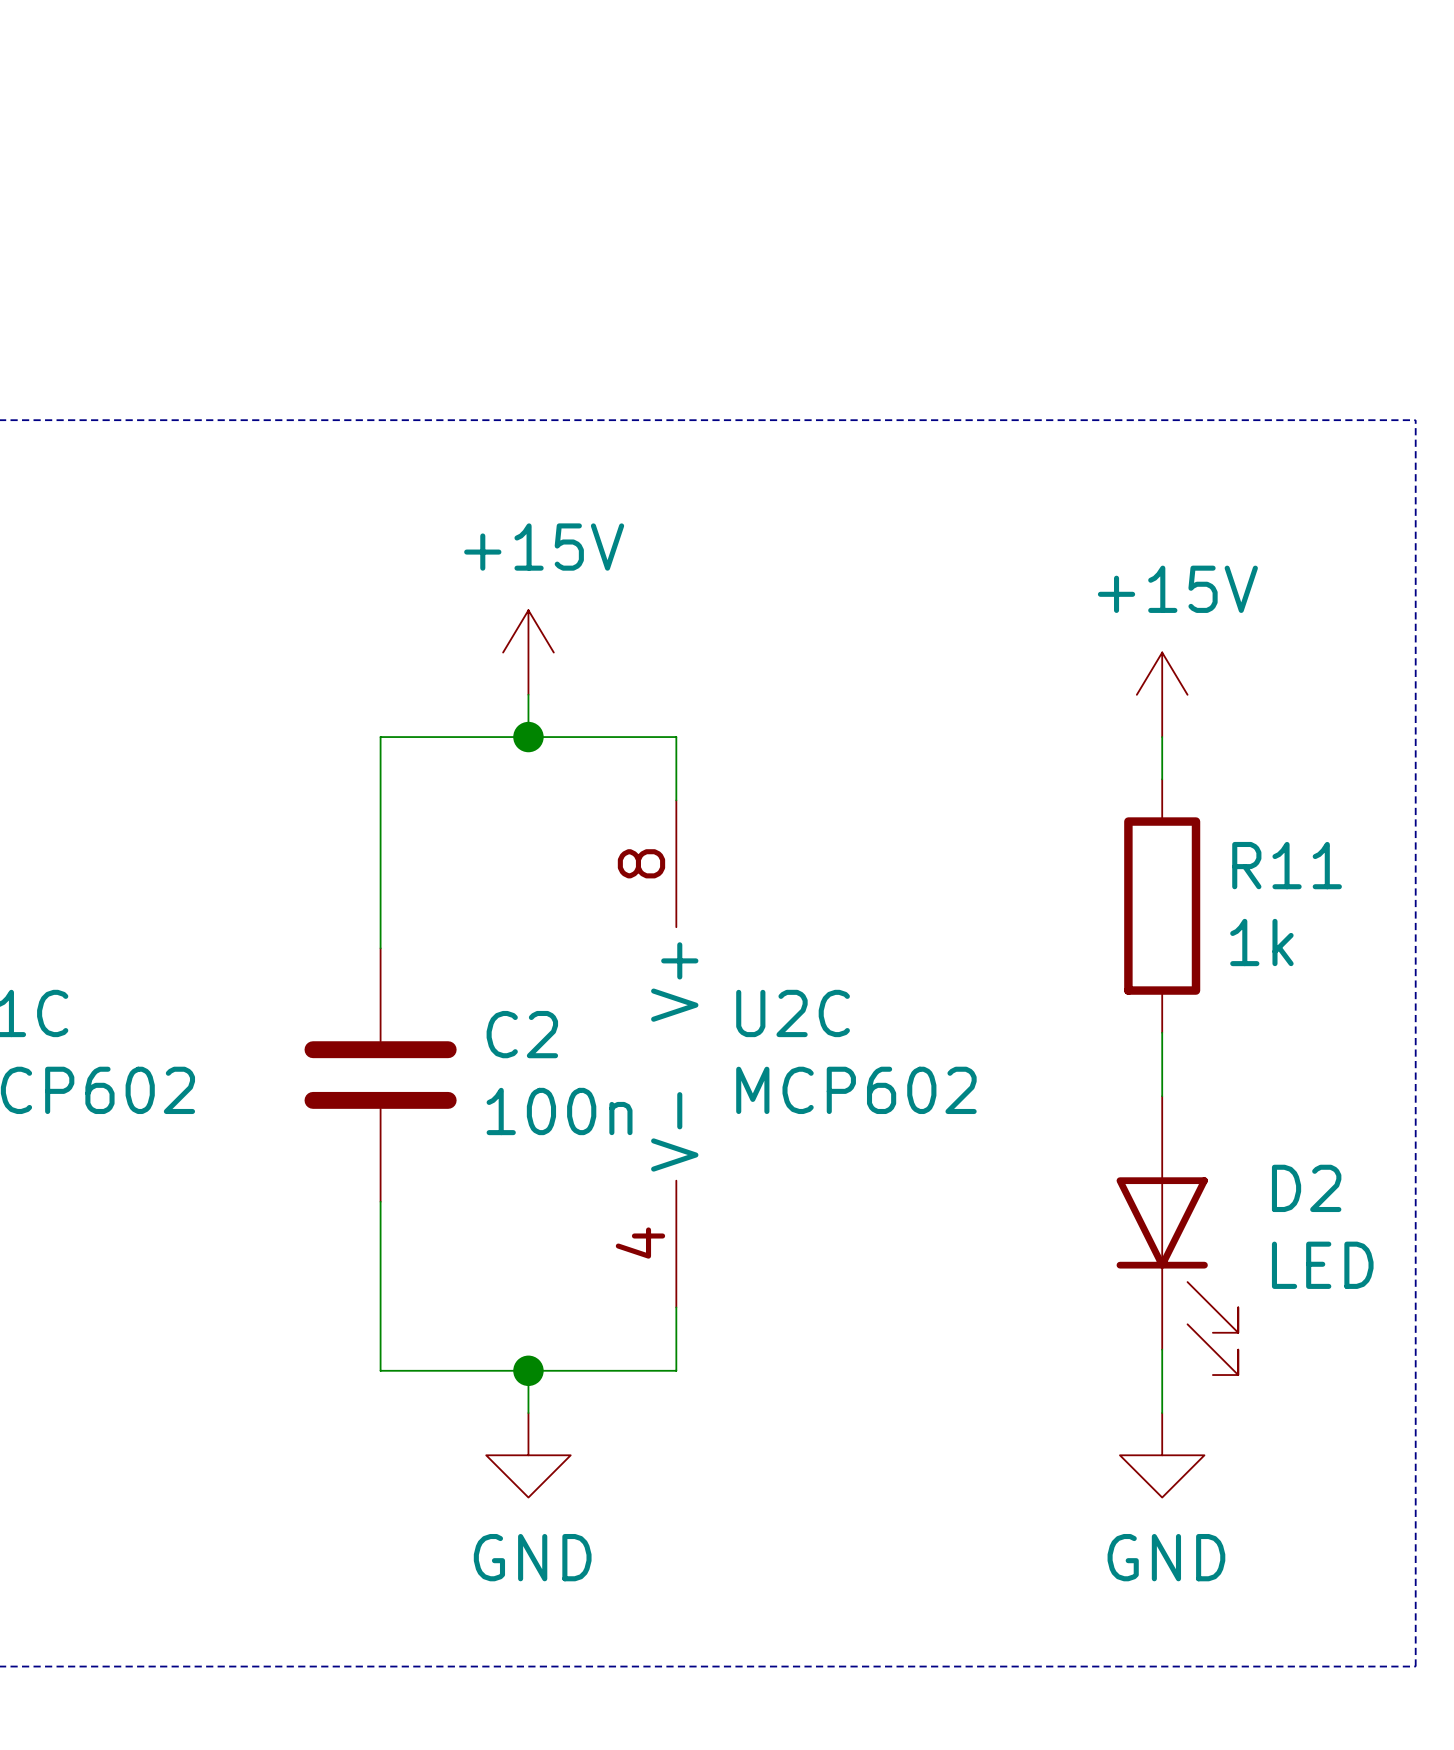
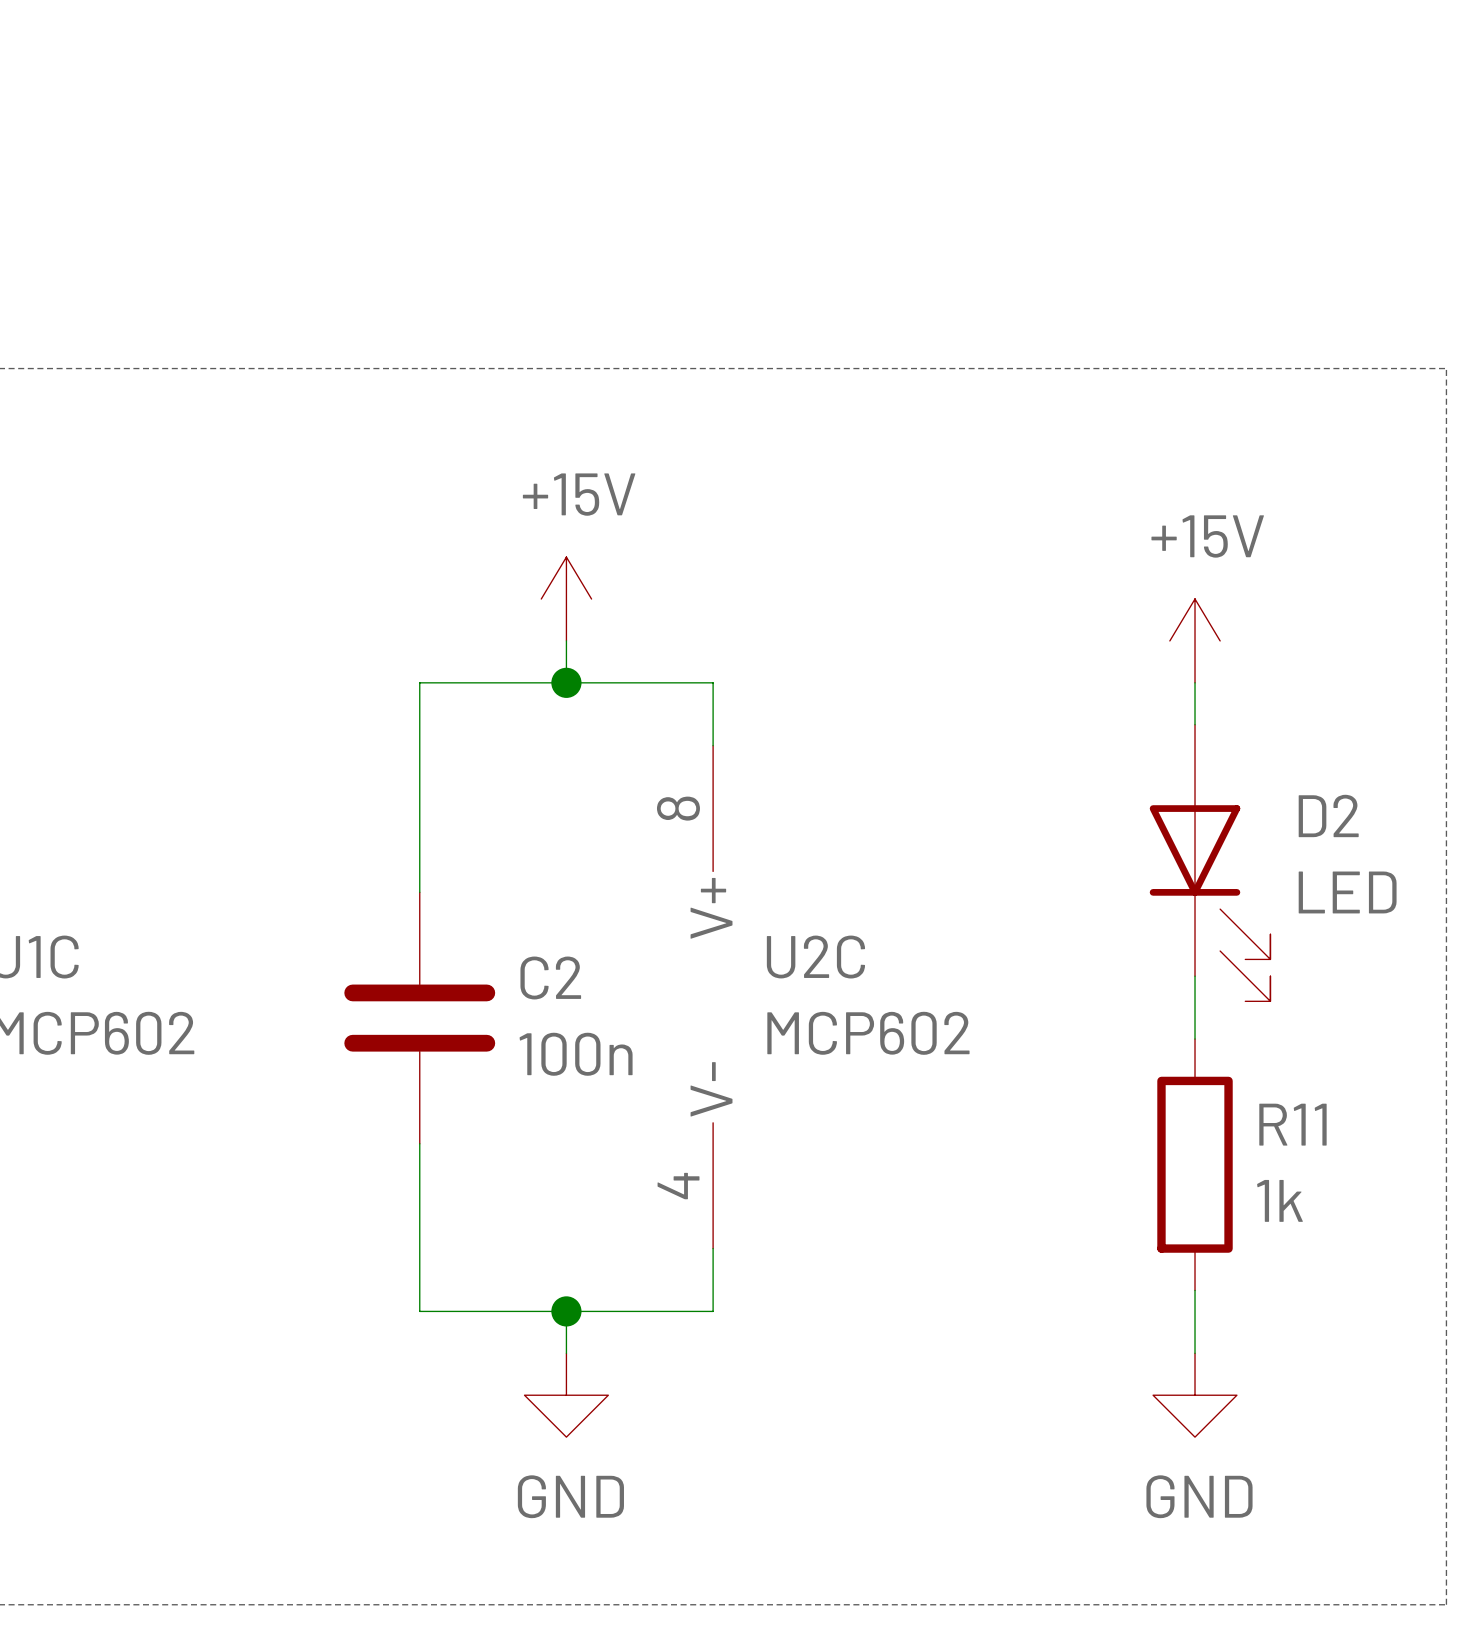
R11 position: (1162, 906) -> (1195, 1164)
D2 position: (1177, 1235) -> (1210, 863)

